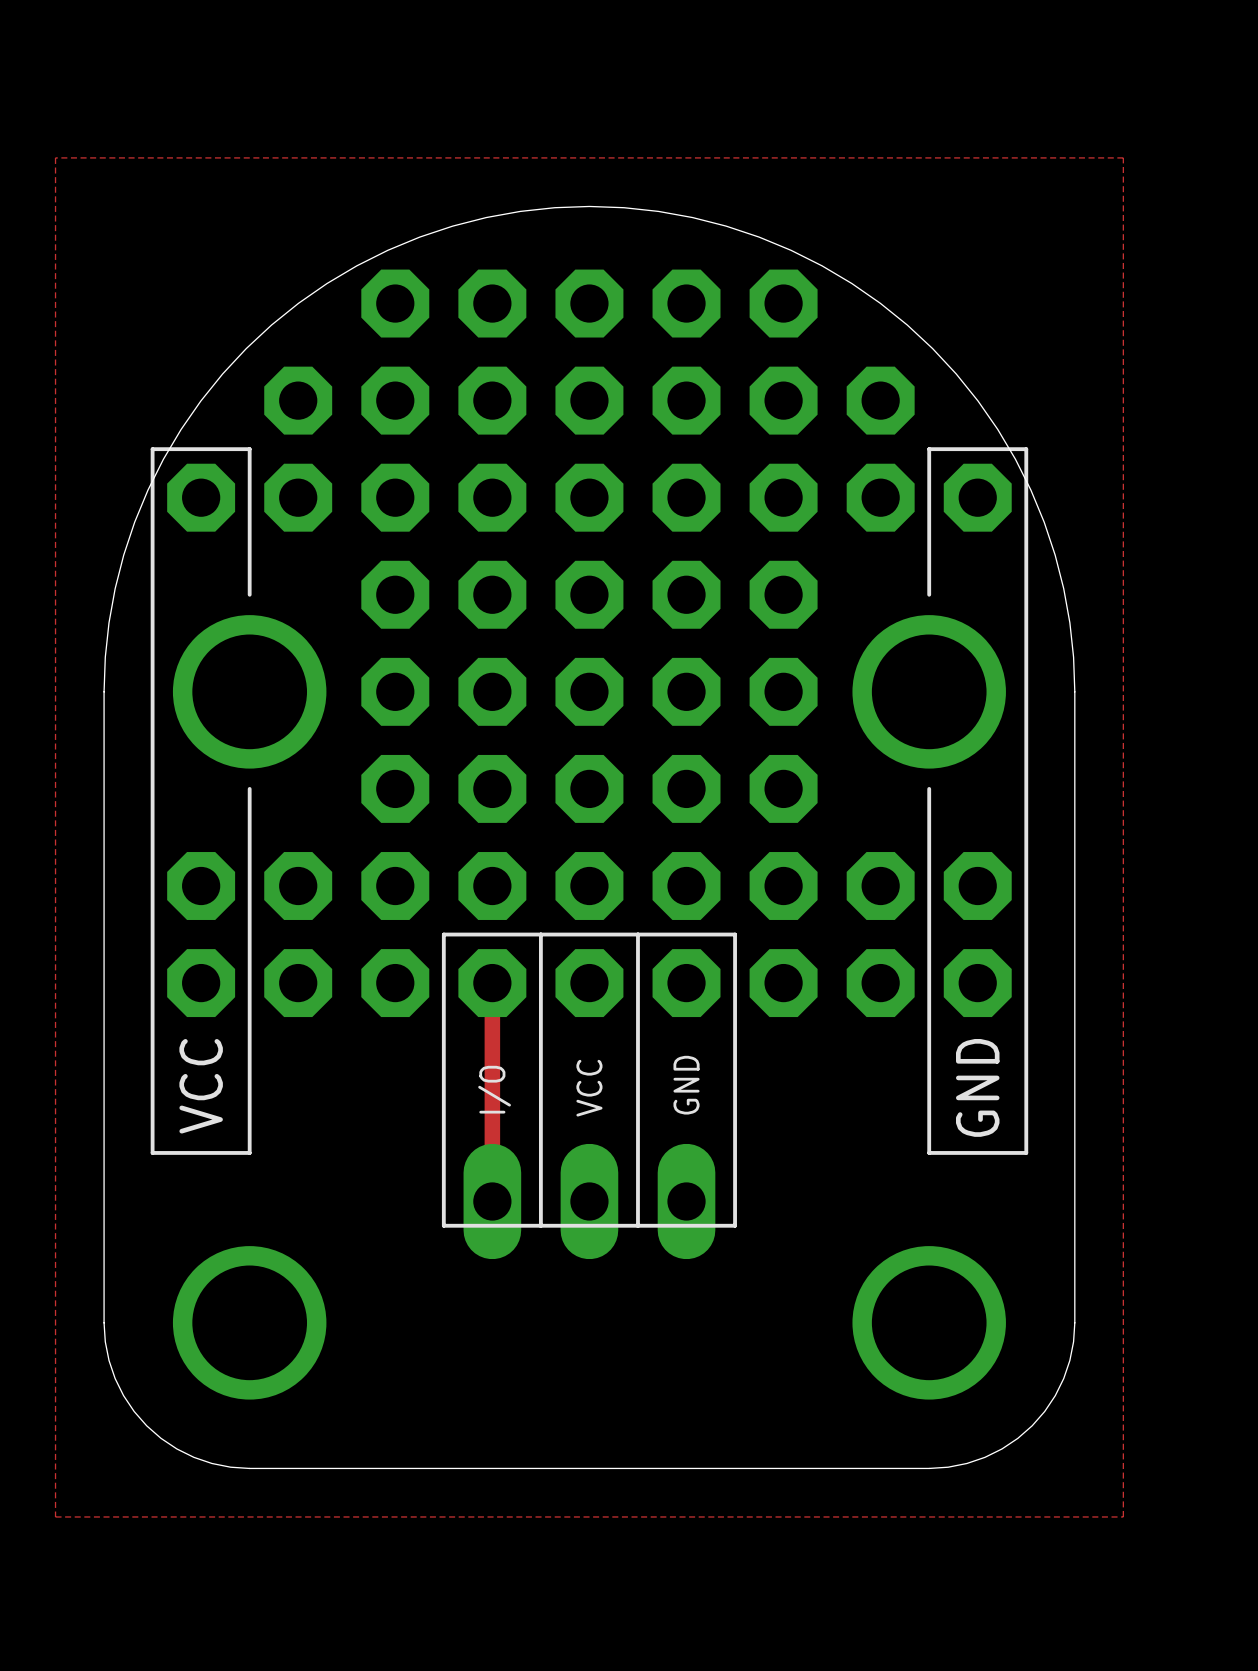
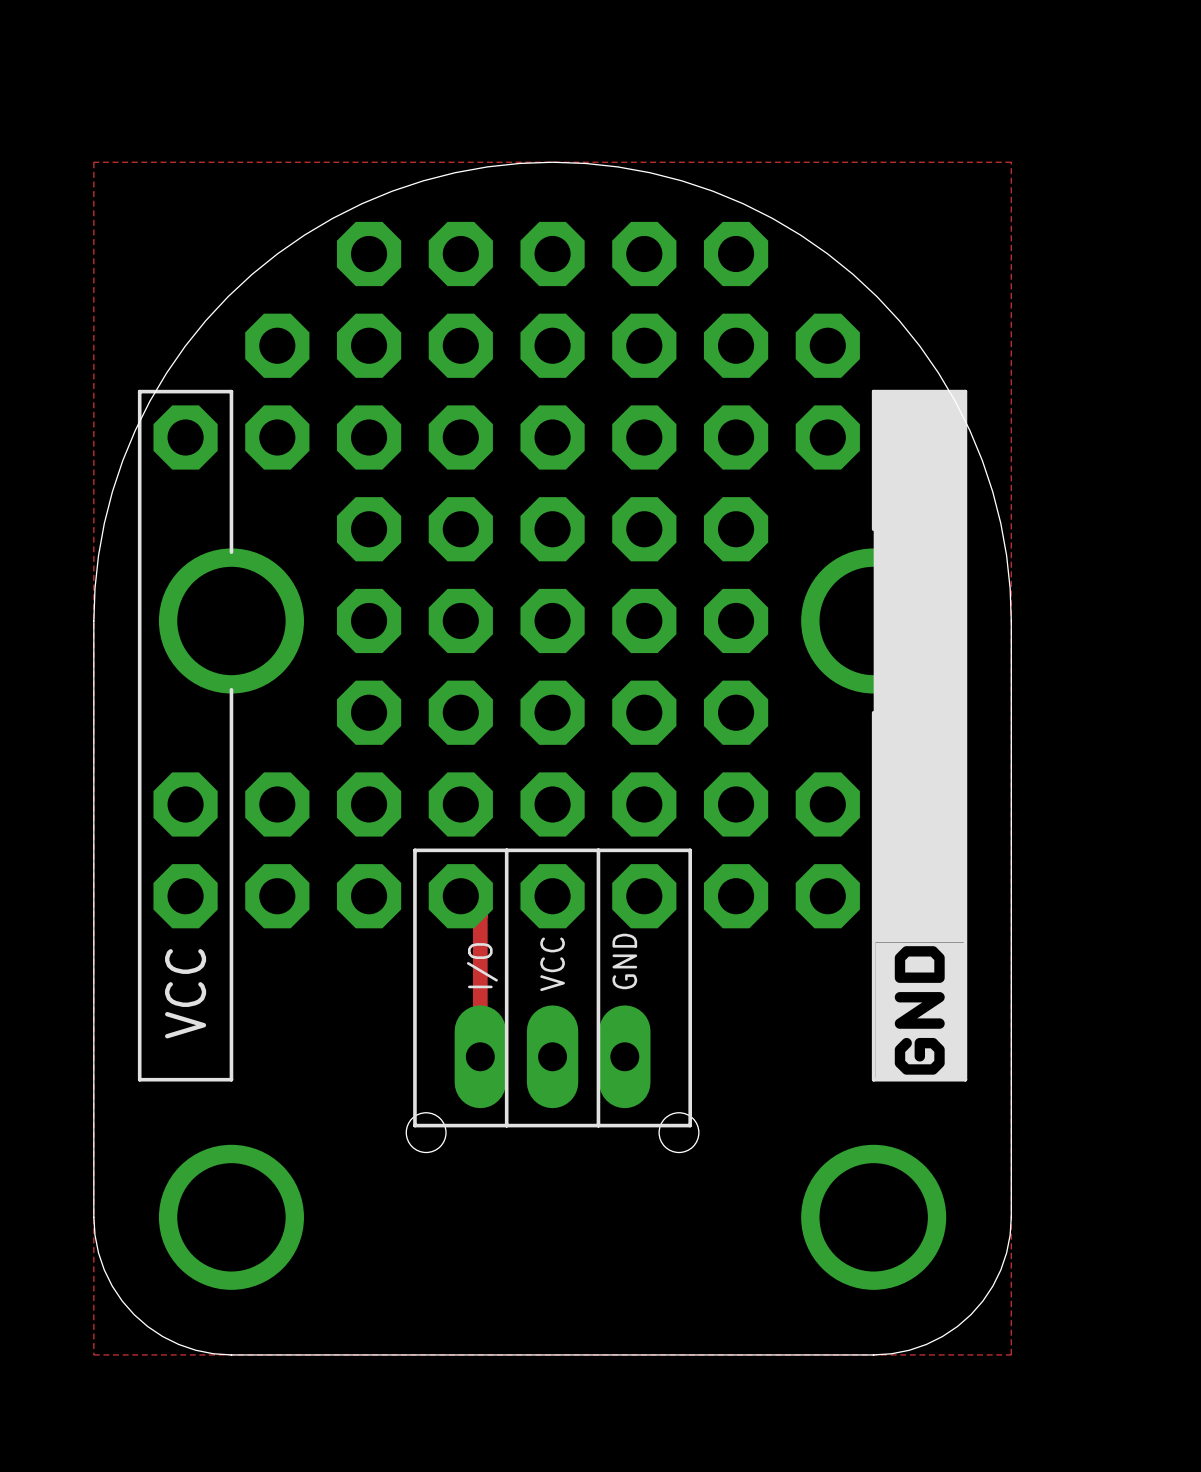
zone outline: (55, 157) (1123, 157) (1123, 1516) (55, 1516) (55, 157) -> (93, 162) (93, 1354) (1011, 1354) (1011, 162) (93, 162)
part footprint: [104, 206, 1075, 1469] -> [93, 162, 1012, 1355]
drawing: none -> [873, 391, 966, 1079]
line: none -> (231, 529) (231, 552)
line: none -> (231, 689) (231, 712)
track: (492, 983) (492, 1201) -> (460, 896) (480, 915) (480, 1056)
text: GND (977, 1087) -> none
line: (152, 1152) (249, 1152) -> (139, 1056) (139, 1079) (231, 1079) (231, 1056)
line: (929, 1152) (1026, 1152) -> (873, 1056) (873, 1079) (965, 1079) (965, 1056)

